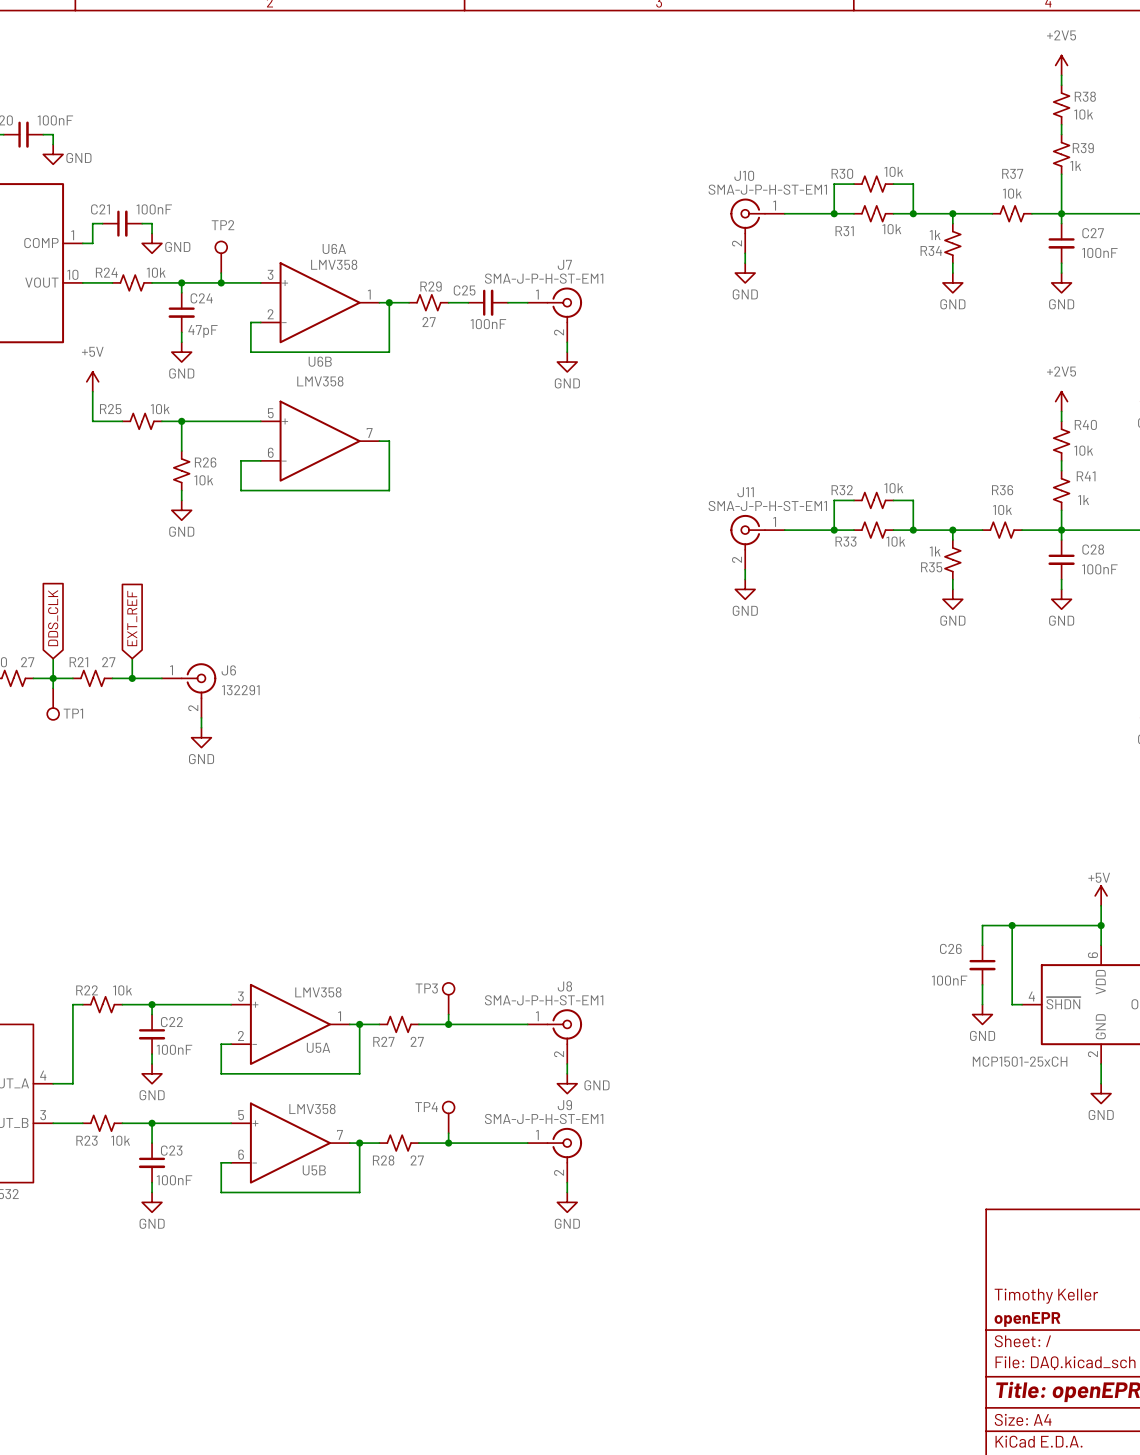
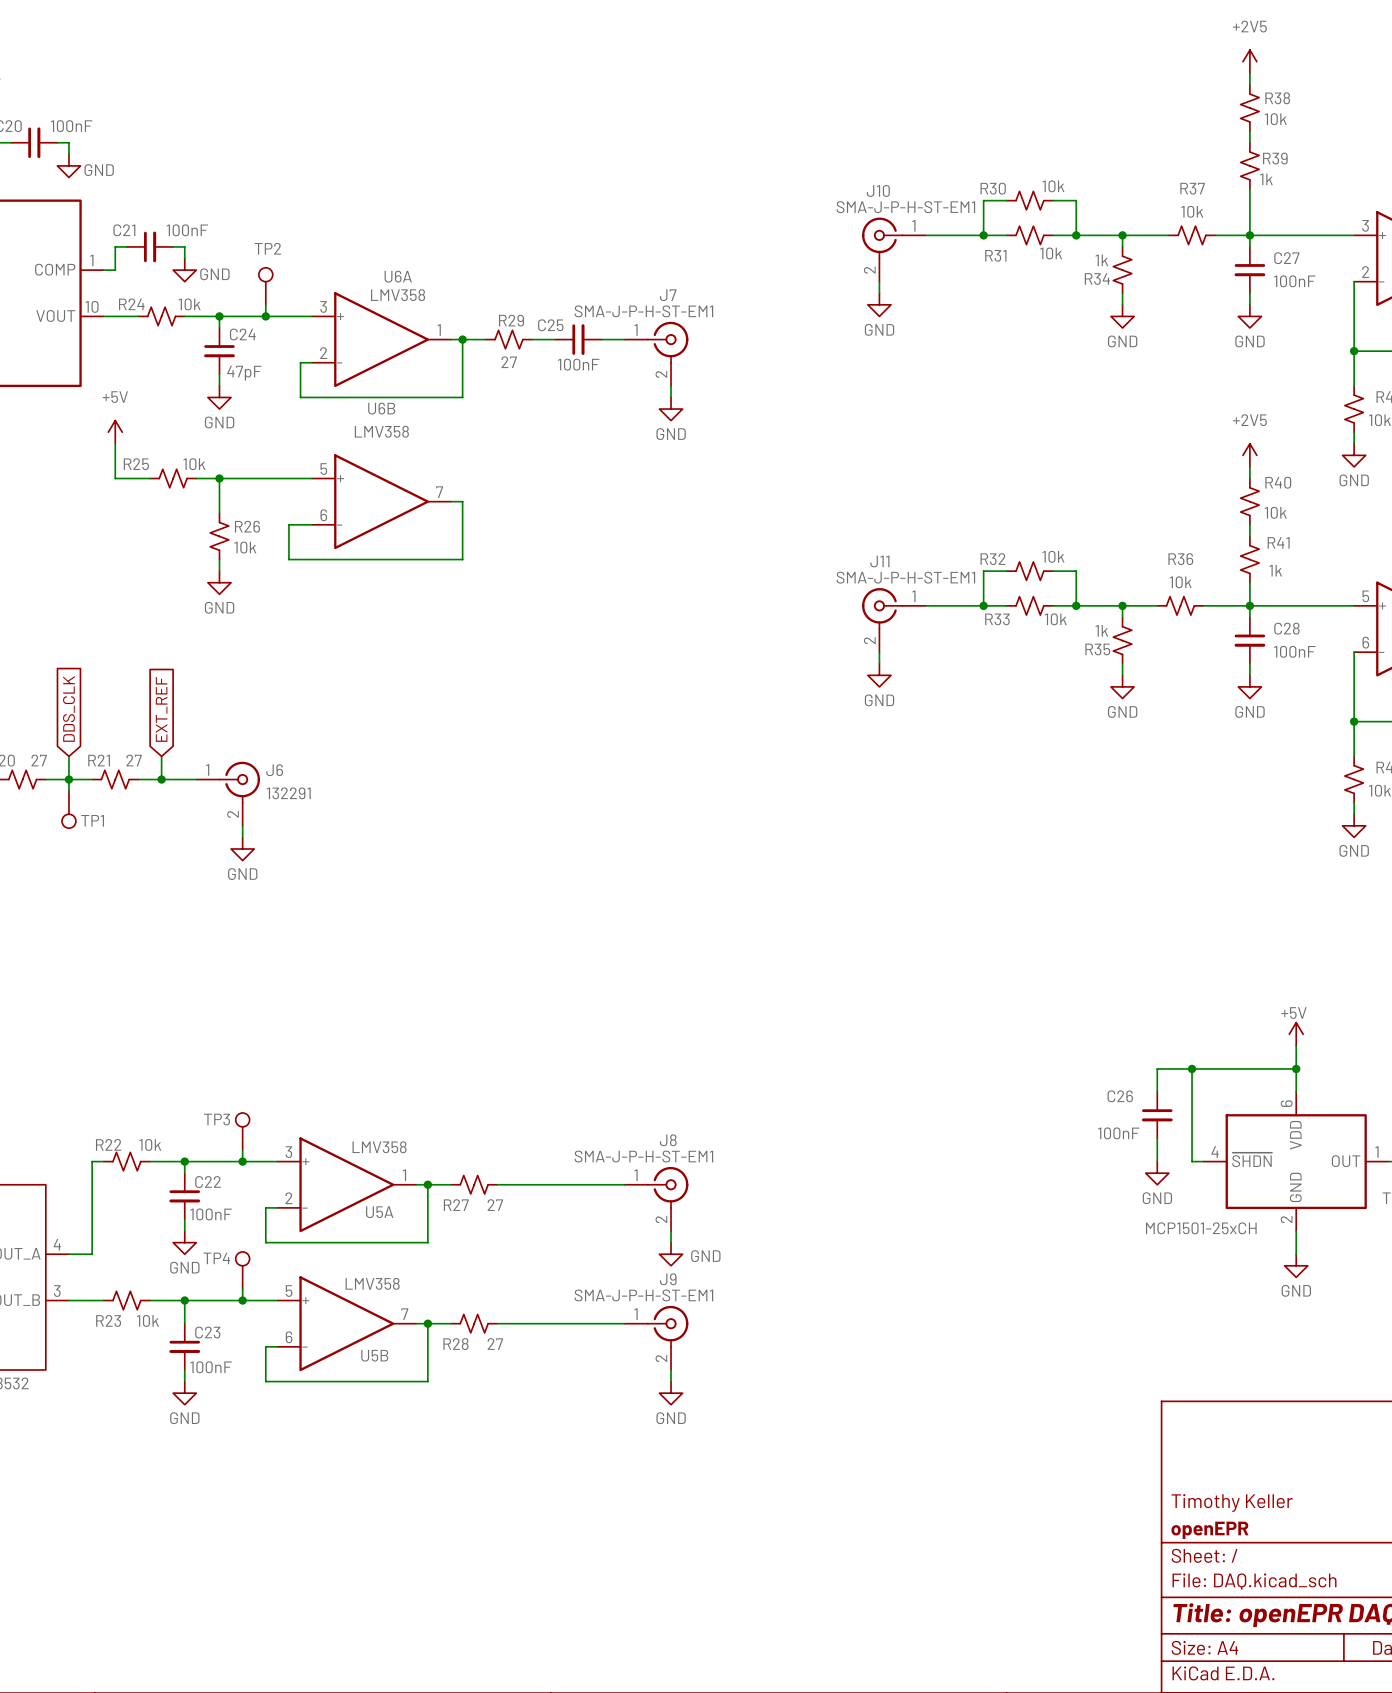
wire: none -> (242, 1150) (242, 1161)
TP3 position: (448, 998) -> (242, 1131)
junction: none -> (242, 1161)
wire: (448, 1014) (448, 1024) -> none
junction: (448, 1024) -> none
wire: none -> (242, 1288) (242, 1300)
TP4 position: (448, 1117) -> (242, 1270)
junction: none -> (242, 1300)
wire: (448, 1133) (448, 1143) -> none
junction: (448, 1143) -> none

